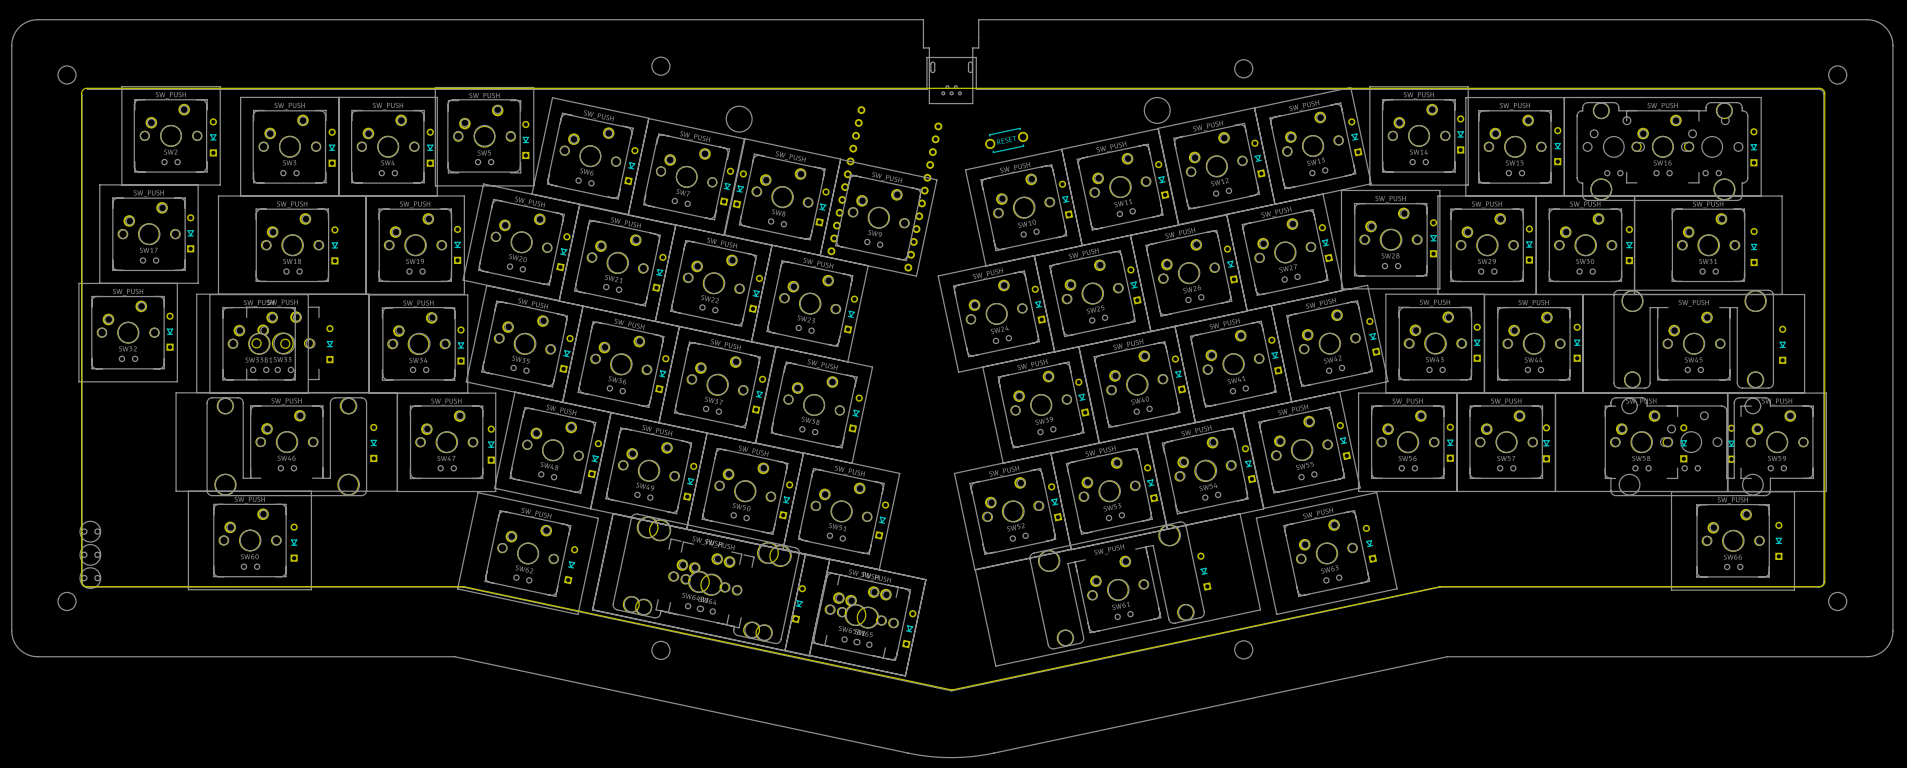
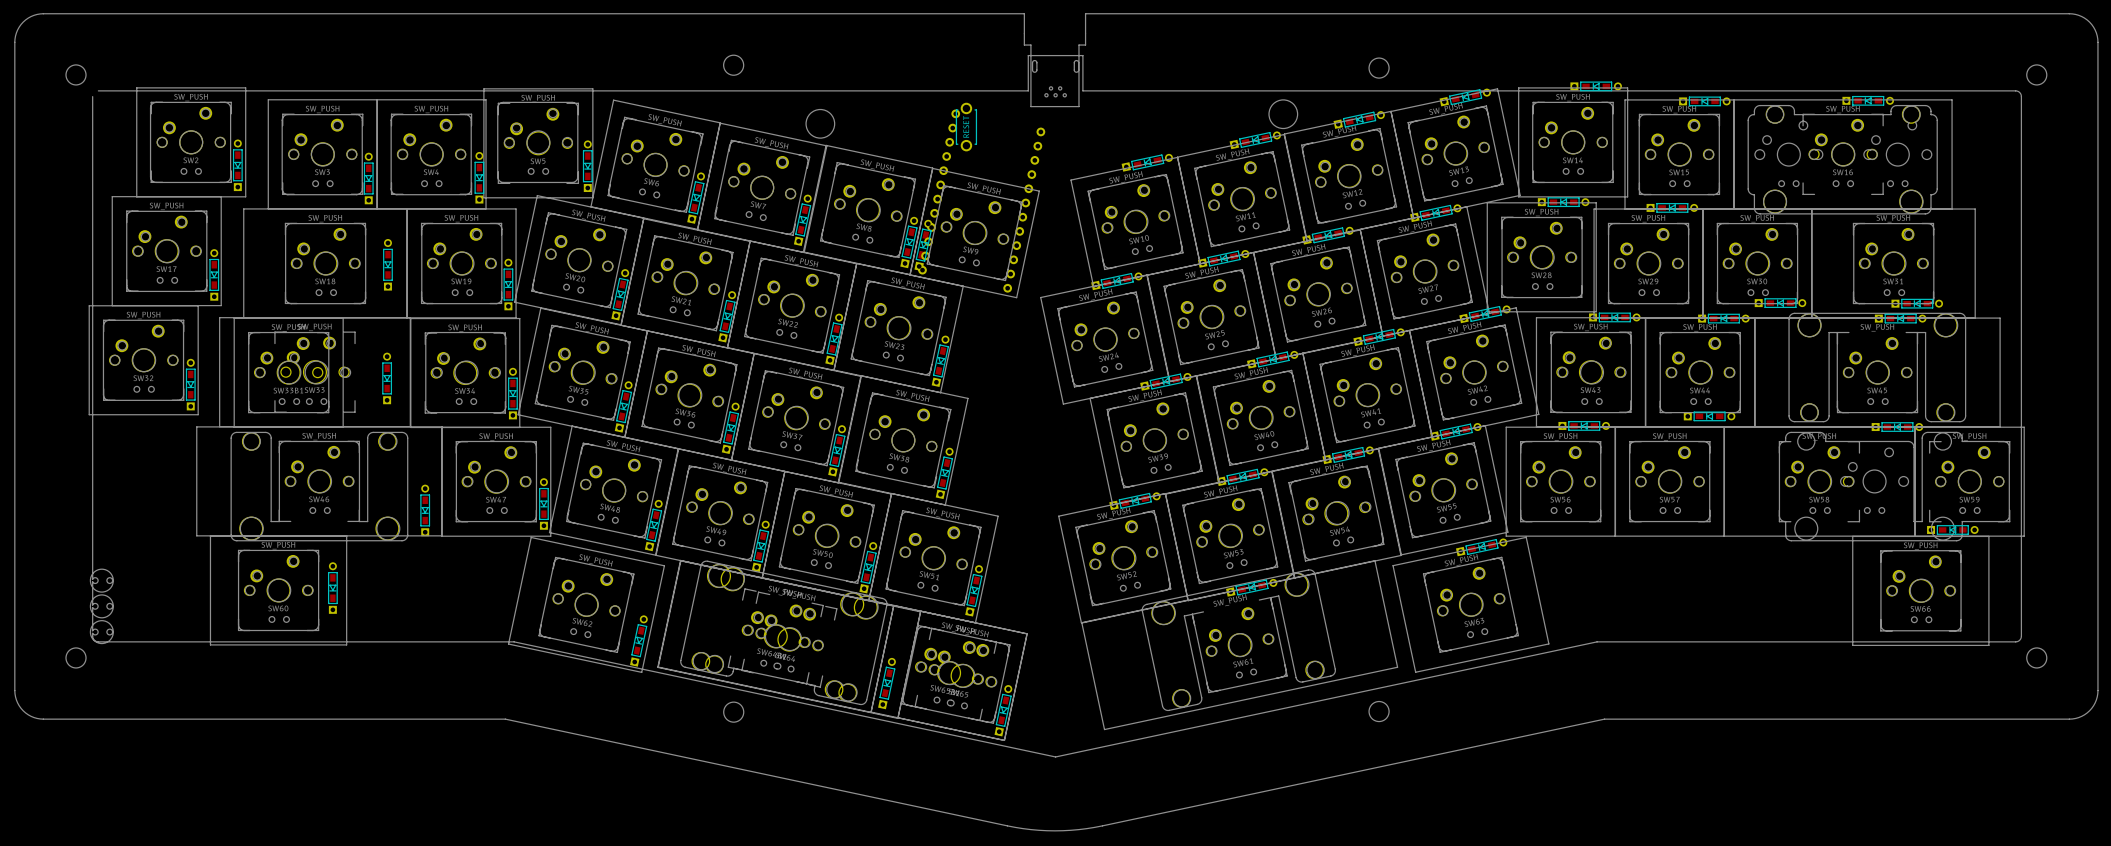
part: none -> (1596, 86)
board edge: (86, 88) (1820, 88) (1824, 93) (1824, 582) (1819, 586) (1439, 586) (951, 690) (463, 586) (85, 586) (81, 581) (81, 93) (83, 89) (86, 88) -> none
part: none -> (1465, 97)
part: none -> (1704, 101)
part: none -> (1868, 100)
part: none -> (1359, 119)
part: none -> (966, 127)
part: none -> (1255, 140)
part: (1460, 134) -> none
part: (213, 137) -> none
part: (1355, 137) -> none
part: (525, 139) -> none
part: (1006, 140) -> none
part: (1557, 146) -> none
part: (332, 147) -> none
part: (430, 147) -> none
part: (1753, 147) -> none
part: none -> (1147, 162)
part: none -> (237, 165)
part: none -> (587, 166)
part: (1258, 158) -> none
part: (631, 166) -> none
part: none -> (479, 177)
part: none -> (368, 178)
part: (1162, 180) -> none
part: none -> (696, 198)
part: (726, 186) -> none
part: (739, 189) -> none
part: none -> (1563, 202)
part: none -> (1672, 207)
part: (1066, 199) -> none
part: none -> (1435, 213)
part: none -> (802, 220)
part: (822, 207) -> none
part: none -> (1327, 235)
part: none -> (909, 242)
part: none -> (923, 245)
part: (190, 233) -> none
part: (1433, 238) -> none
part: none -> (1223, 258)
part: (1325, 243) -> none
part: (457, 244) -> none
part: (1529, 244) -> none
part: (334, 245) -> none
part: (1629, 245) -> none
part: none -> (387, 264)
part: (1754, 247) -> none
part: (563, 252) -> none
part: none -> (214, 274)
part: none -> (1116, 281)
part: none -> (508, 284)
part: (1231, 264) -> none
part: (659, 272) -> none
part: none -> (620, 294)
part: none -> (1780, 303)
part: none -> (1917, 303)
part: (1134, 285) -> none
part: none -> (1484, 314)
part: none -> (727, 316)
part: (755, 293) -> none
part: none -> (1614, 317)
part: none -> (1723, 318)
part: none -> (1900, 318)
part: (1038, 304) -> none
part: none -> (1379, 337)
part: none -> (834, 339)
part: (850, 314) -> none
part: (170, 331) -> none
part: none -> (1272, 359)
part: none -> (940, 361)
part: (1373, 336) -> none
part: (1477, 342) -> none
part: (1577, 342) -> none
part: (329, 344) -> none
part: (1782, 344) -> none
part: (461, 345) -> none
part: none -> (387, 378)
part: none -> (1165, 381)
part: none -> (190, 384)
part: (566, 354) -> none
part: (1275, 355) -> none
part: none -> (512, 393)
part: none -> (623, 406)
part: (662, 374) -> none
part: (1178, 374) -> none
part: none -> (1709, 416)
part: none -> (1584, 425)
part: none -> (1897, 427)
part: none -> (730, 428)
part: (758, 394) -> none
part: (1082, 397) -> none
part: none -> (1455, 431)
part: (855, 413) -> none
part: none -> (837, 450)
part: none -> (1348, 455)
part: none -> (944, 473)
part: none -> (1242, 477)
part: (1343, 441) -> none
part: (373, 442) -> none
part: (1450, 442) -> none
part: (1546, 443) -> none
part: (1683, 443) -> none
part: (1731, 443) -> none
part: (491, 444) -> none
part: (594, 459) -> none
part: none -> (1134, 501)
part: none -> (543, 503)
part: (1249, 464) -> none
part: none -> (425, 510)
part: none -> (653, 525)
part: (690, 481) -> none
part: (1151, 483) -> none
part: none -> (1952, 529)
part: none -> (760, 546)
part: (786, 500) -> none
part: none -> (1481, 547)
part: (1055, 502) -> none
part: none -> (868, 567)
part: (882, 520) -> none
part: none -> (332, 588)
part: none -> (1251, 587)
part: none -> (974, 590)
part: (1778, 540) -> none
part: (294, 542) -> none
part: (1369, 543) -> none
part: (571, 565) -> none
part: (1204, 571) -> none
part: none -> (638, 641)
part: (798, 604) -> none
part: none -> (886, 683)
part: (909, 629) -> none
part: none -> (1003, 710)

